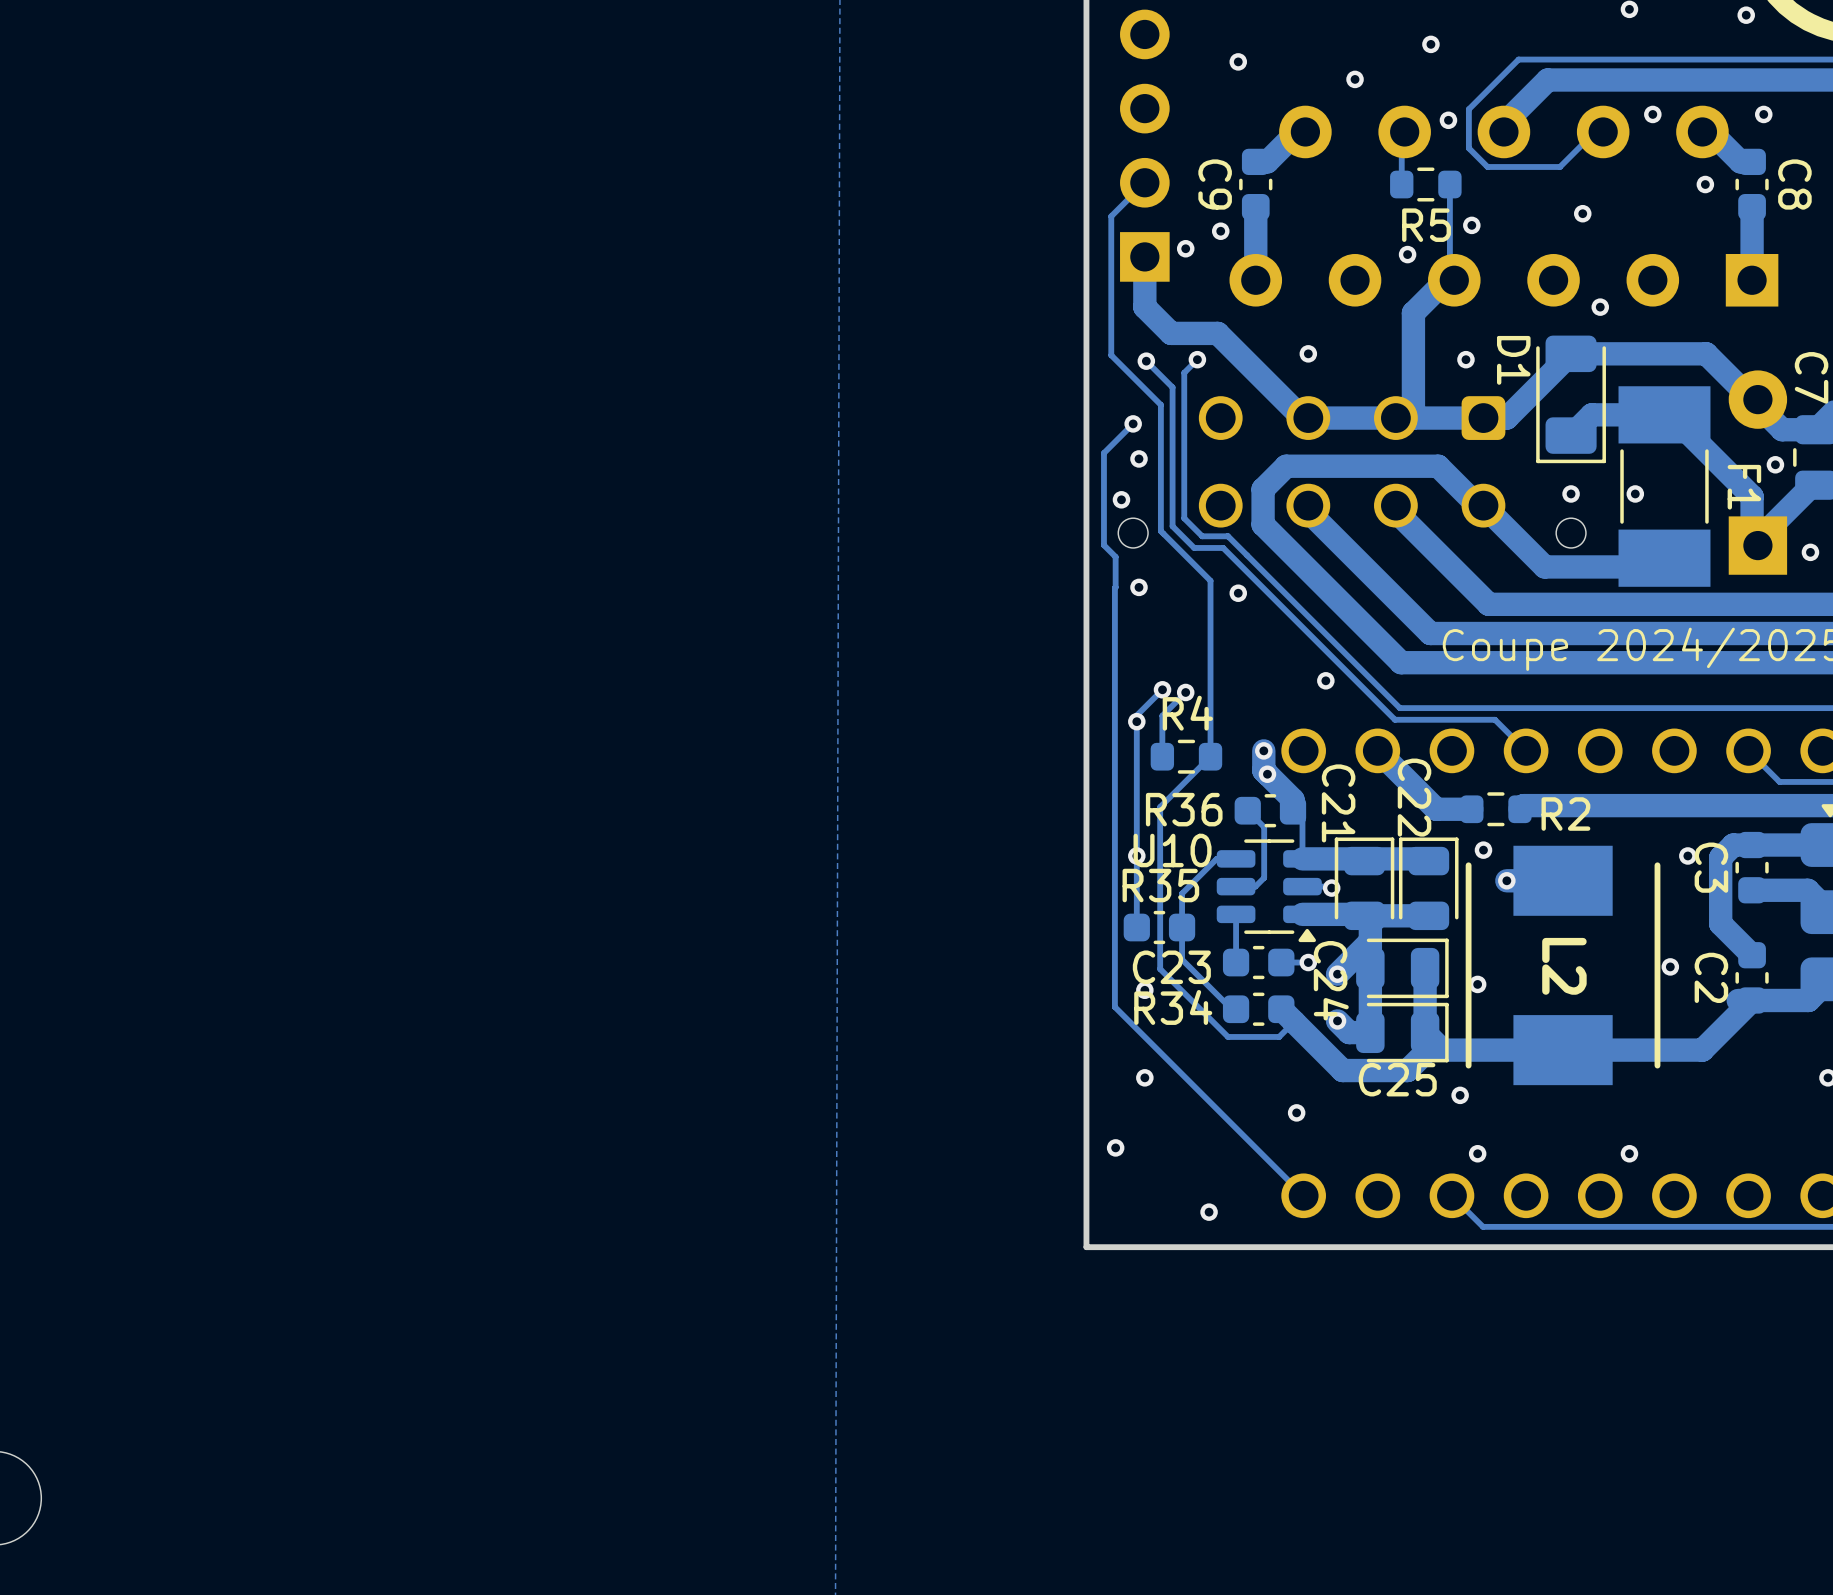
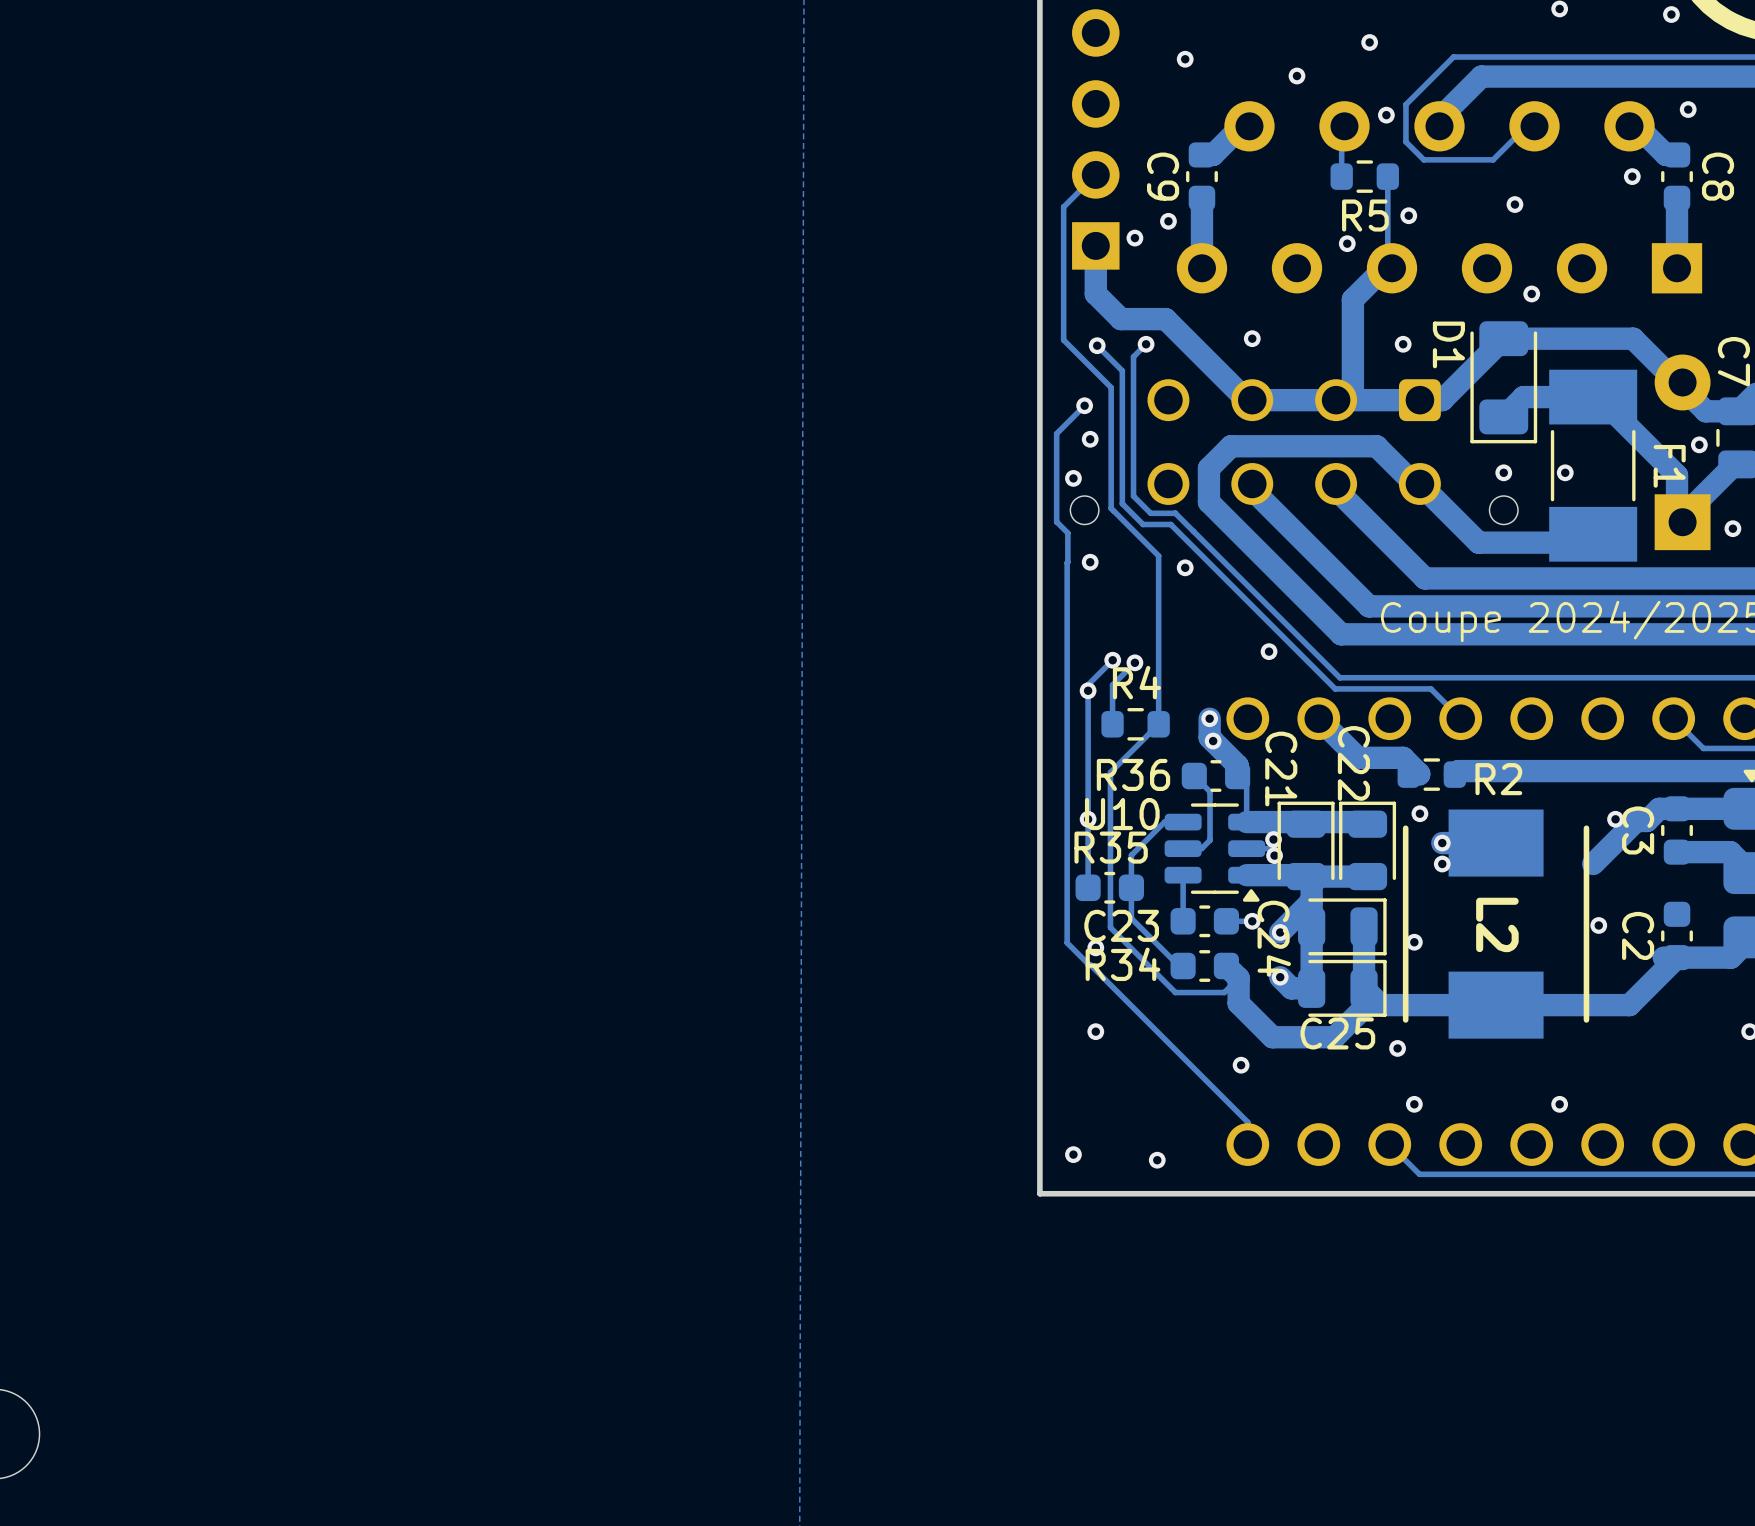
via: (1652, 114) -> none
track: (1418, 791) (1436, 809) (1471, 809) -> (1357, 757) (1403, 757) (1419, 774)
track: (1720, 857) (1720, 923) (1752, 955) -> (1646, 820) (1636, 820) (1593, 864)
via: none -> (1273, 839)
via: (1331, 888) -> none
via: none -> (1274, 855)
via: none -> (1442, 864)
track: (1114, 985) (1114, 1007) (1303, 1195) -> (1067, 942) (1247, 1122) (1247, 1144)
track: (1294, 1022) (1342, 1070) (1407, 1070) -> (1238, 978) (1238, 1003) (1272, 1037) (1334, 1037) (1347, 1024)
via position: (1115, 1147) -> (1073, 1154)

